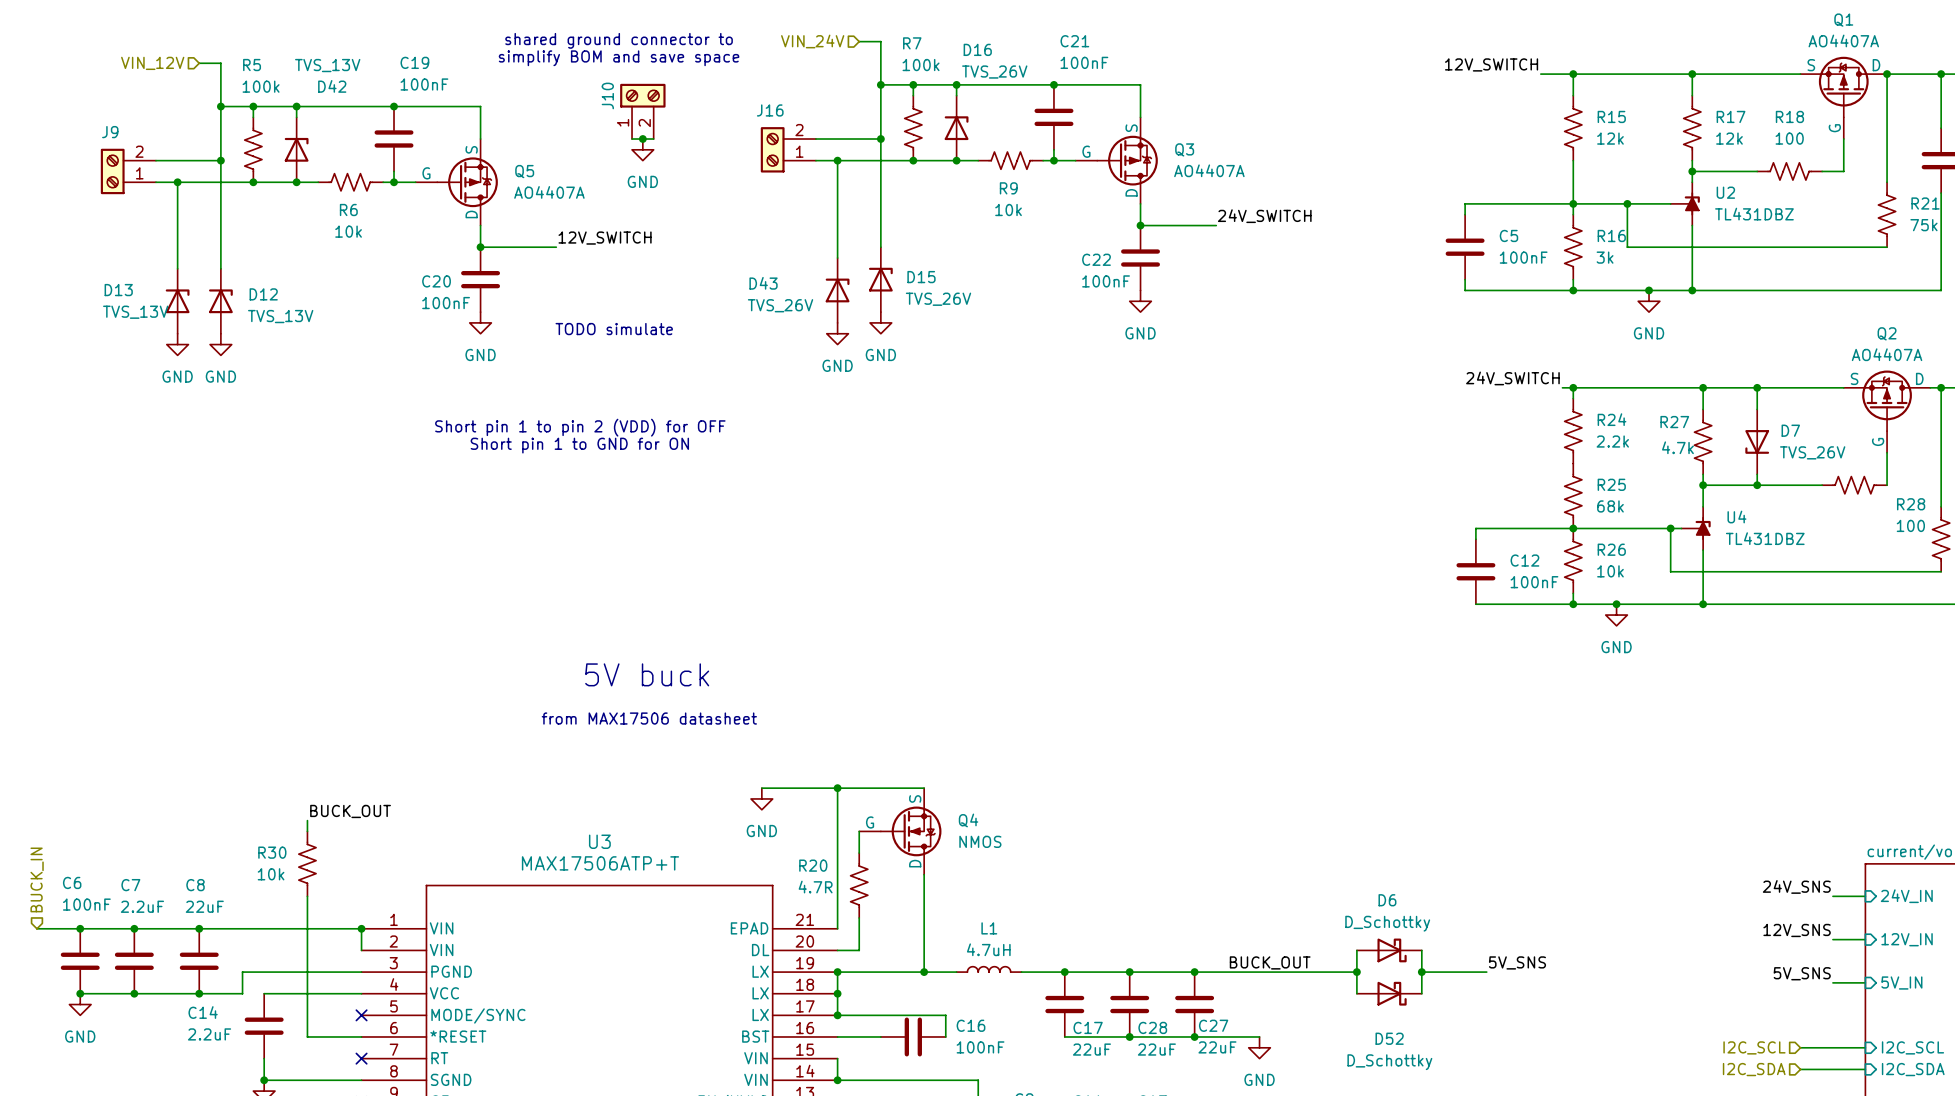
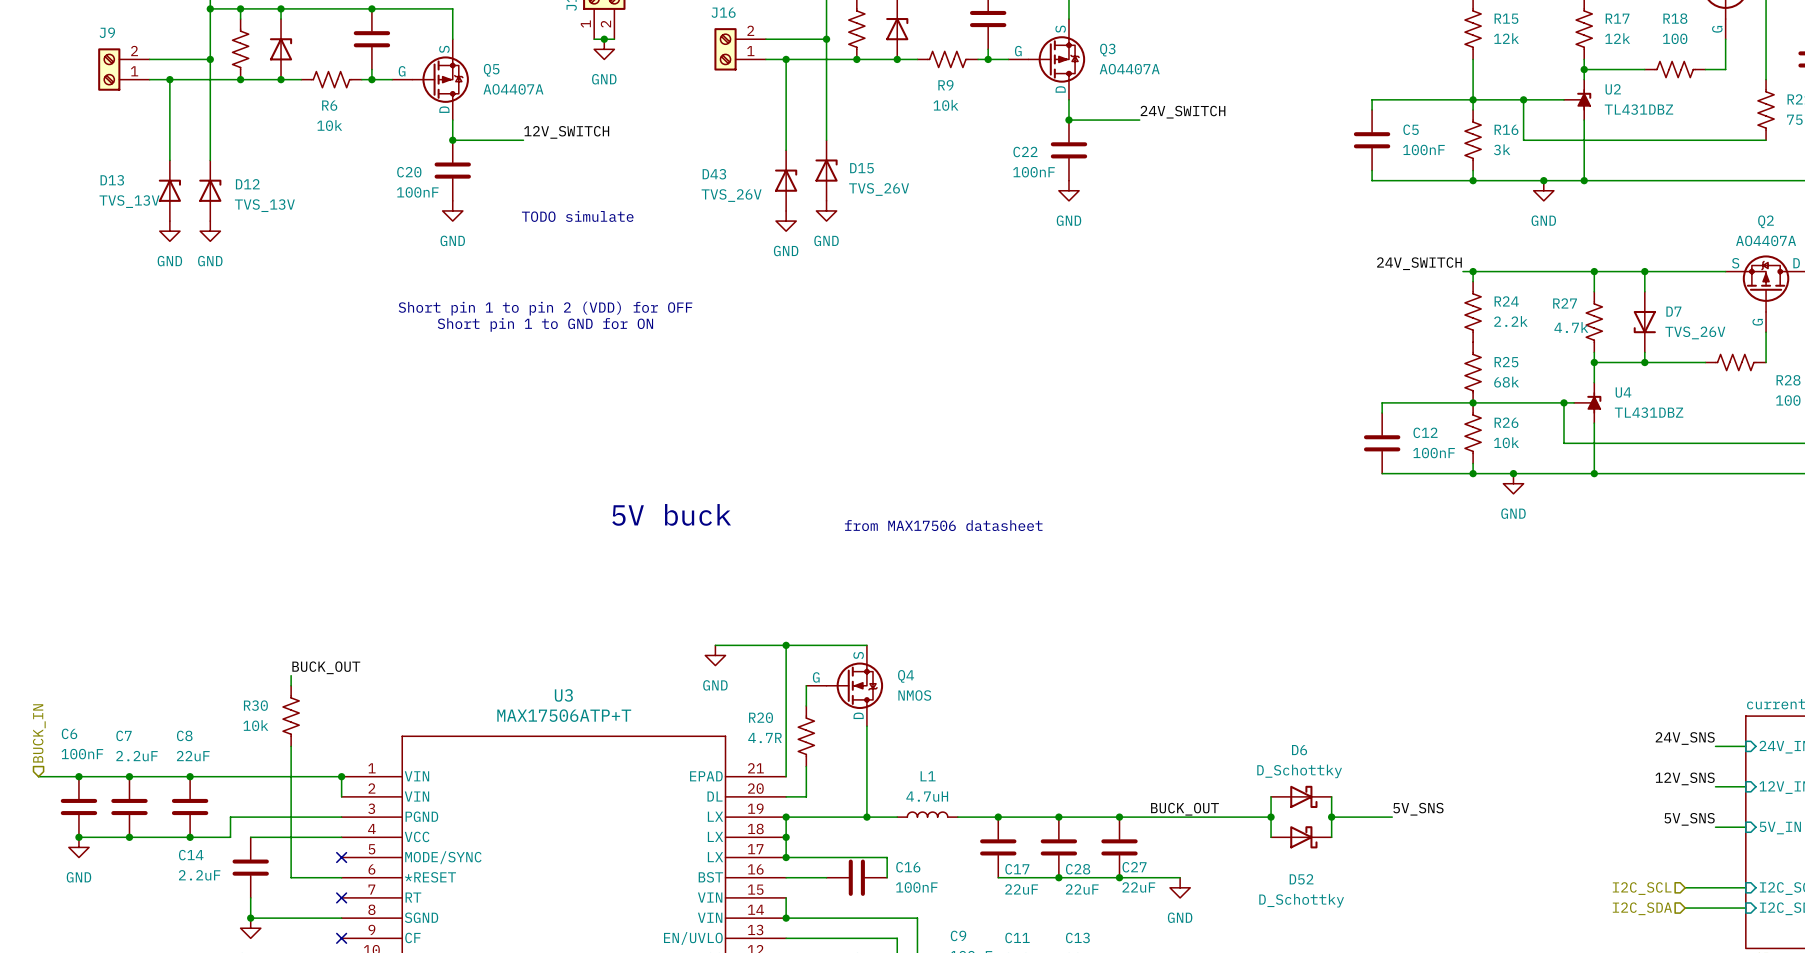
text: none -> from MAX17506 datasheet (943, 525)
text position: 5V buck (647, 674) -> 5V buck (671, 514)
text: from MAX17506 datasheet (649, 718) -> none

